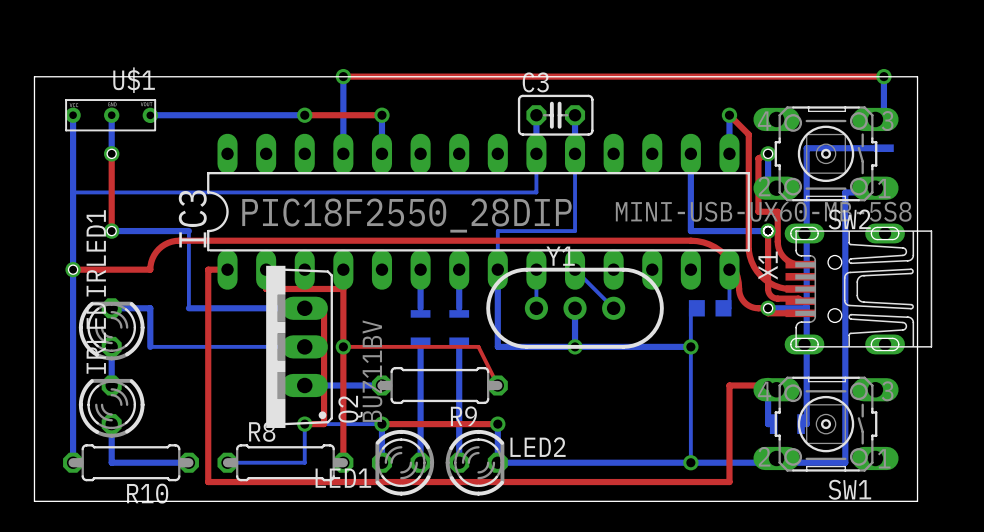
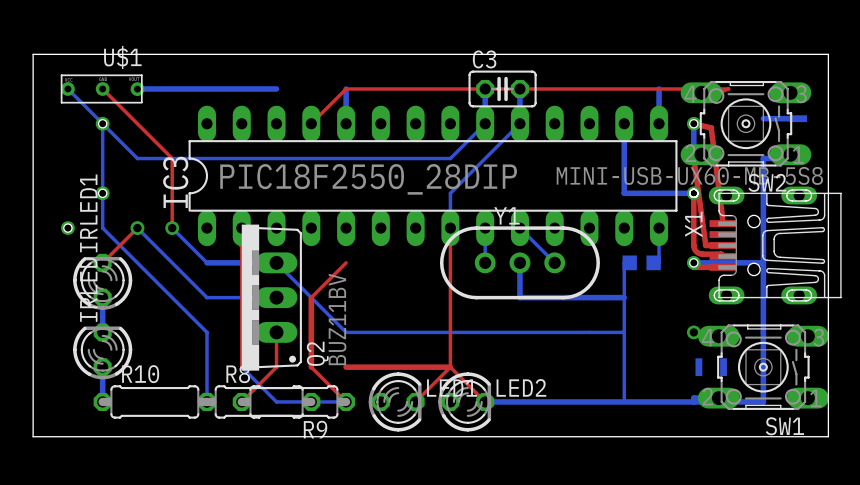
top track: (343, 76) (883, 76) -> none
bottom track: (343, 76) (343, 153) -> none
via: (343, 76) -> none
bottom track: (883, 76) (883, 115) (875, 119) -> none
via: (883, 76) -> none
bottom track: (73, 115) (73, 462) -> none
top track: none -> (102, 88) (172, 158) (172, 228)
bottom track: (111, 115) (111, 153) -> (207, 401) (207, 332) (102, 228) (102, 123)
top track: (304, 115) (381, 115) -> none
via: (304, 115) -> none
via: (381, 115) -> none
top track: (729, 115) (748, 134) (748, 250) (751, 261) (760, 275) (769, 282) (785, 288) (797, 288) -> none
via: (729, 115) -> none
top track: none -> (718, 92) (728, 88) (346, 88) (311, 123)
bottom track: (845, 148) (806, 148) (806, 424) (801, 424) -> none
top track: (111, 153) (111, 231) -> none
bottom track: (536, 153) (536, 192) (497, 192) -> (485, 123) (450, 158)
bottom track: (575, 153) (575, 231) (497, 231) -> (519, 123) (450, 193)
top track: (768, 153) (758, 158) (758, 211) (777, 211) (779, 250) (786, 259) (800, 264) -> (693, 123) (711, 127) (723, 223)
bottom track: (73, 192) (150, 192) -> (67, 88) (137, 158)
top track: none -> (693, 158) (705, 245) (723, 245)
bottom track: (111, 231) (188, 231) (188, 308) (227, 308) -> (172, 228) (207, 262)
top track: (73, 269) (150, 269) (152, 258) (158, 249) (168, 242) (179, 240) (690, 240) (703, 242) (720, 250) (729, 259) (735, 270) (739, 293) (743, 300) (753, 307) (768, 308) -> none
top track: none -> (137, 228) (102, 262)
via: none -> (137, 228)
via: none -> (172, 228)
top track: (227, 269) (208, 269) (208, 482) (729, 482) (729, 385) (768, 385) -> none
bottom track: (420, 269) (420, 308) -> none
bottom track: (459, 269) (459, 308) -> none
top track: none -> (450, 228) (450, 367)
bottom track: (497, 269) (497, 346) (575, 346) -> none
top track: (266, 288) (343, 288) (343, 346) (478, 346) (497, 385) -> (241, 245) (241, 367)
bottom track: (111, 308) (150, 308) (150, 346) (227, 346) -> (137, 228) (207, 297)
top track: (304, 308) (324, 308) (324, 424) (304, 424) -> none
bottom track: none -> (276, 262) (346, 332) (624, 332)
top track: none -> (346, 262) (311, 297)
bottom track: none -> (728, 262) (763, 262)
part: (420, 327) -> none
part: (459, 327) -> none
via: (343, 346) -> none
bottom track: (420, 346) (420, 462) -> none
bottom track: (459, 346) (459, 462) -> none
via: (575, 346) -> none
via: (690, 346) -> none
top track: none -> (276, 332) (276, 367) (241, 401)
bottom track: (304, 385) (381, 385) -> none
R9 position: (439, 385) -> (293, 401)
bottom track: (776, 389) (770, 389) (768, 385) (768, 424) (773, 424) -> none
via: (304, 424) -> none
top track: (343, 424) (343, 462) -> (311, 367) (346, 401)
via: (381, 424) -> none
top track: none -> (450, 367) (415, 401)
top track: none -> (450, 367) (485, 401)
bottom track: (497, 424) (497, 462) (536, 462) -> none
via: (497, 424) -> none
SW1 position: (826, 424) -> (763, 367)
bottom track: (111, 462) (188, 462) -> none
R10 position: (131, 462) -> (154, 401)
bottom track: (227, 462) (304, 462) (304, 424) (381, 424) (381, 462) -> (241, 367) (276, 401) (346, 401)
LED1 rotation: 0° (403, 462) -> 180° (396, 401)
LED2 position: (476, 462) -> (466, 401)
via: (690, 462) -> none
R10 name position: R10 (147, 493) -> R10 (140, 374)

